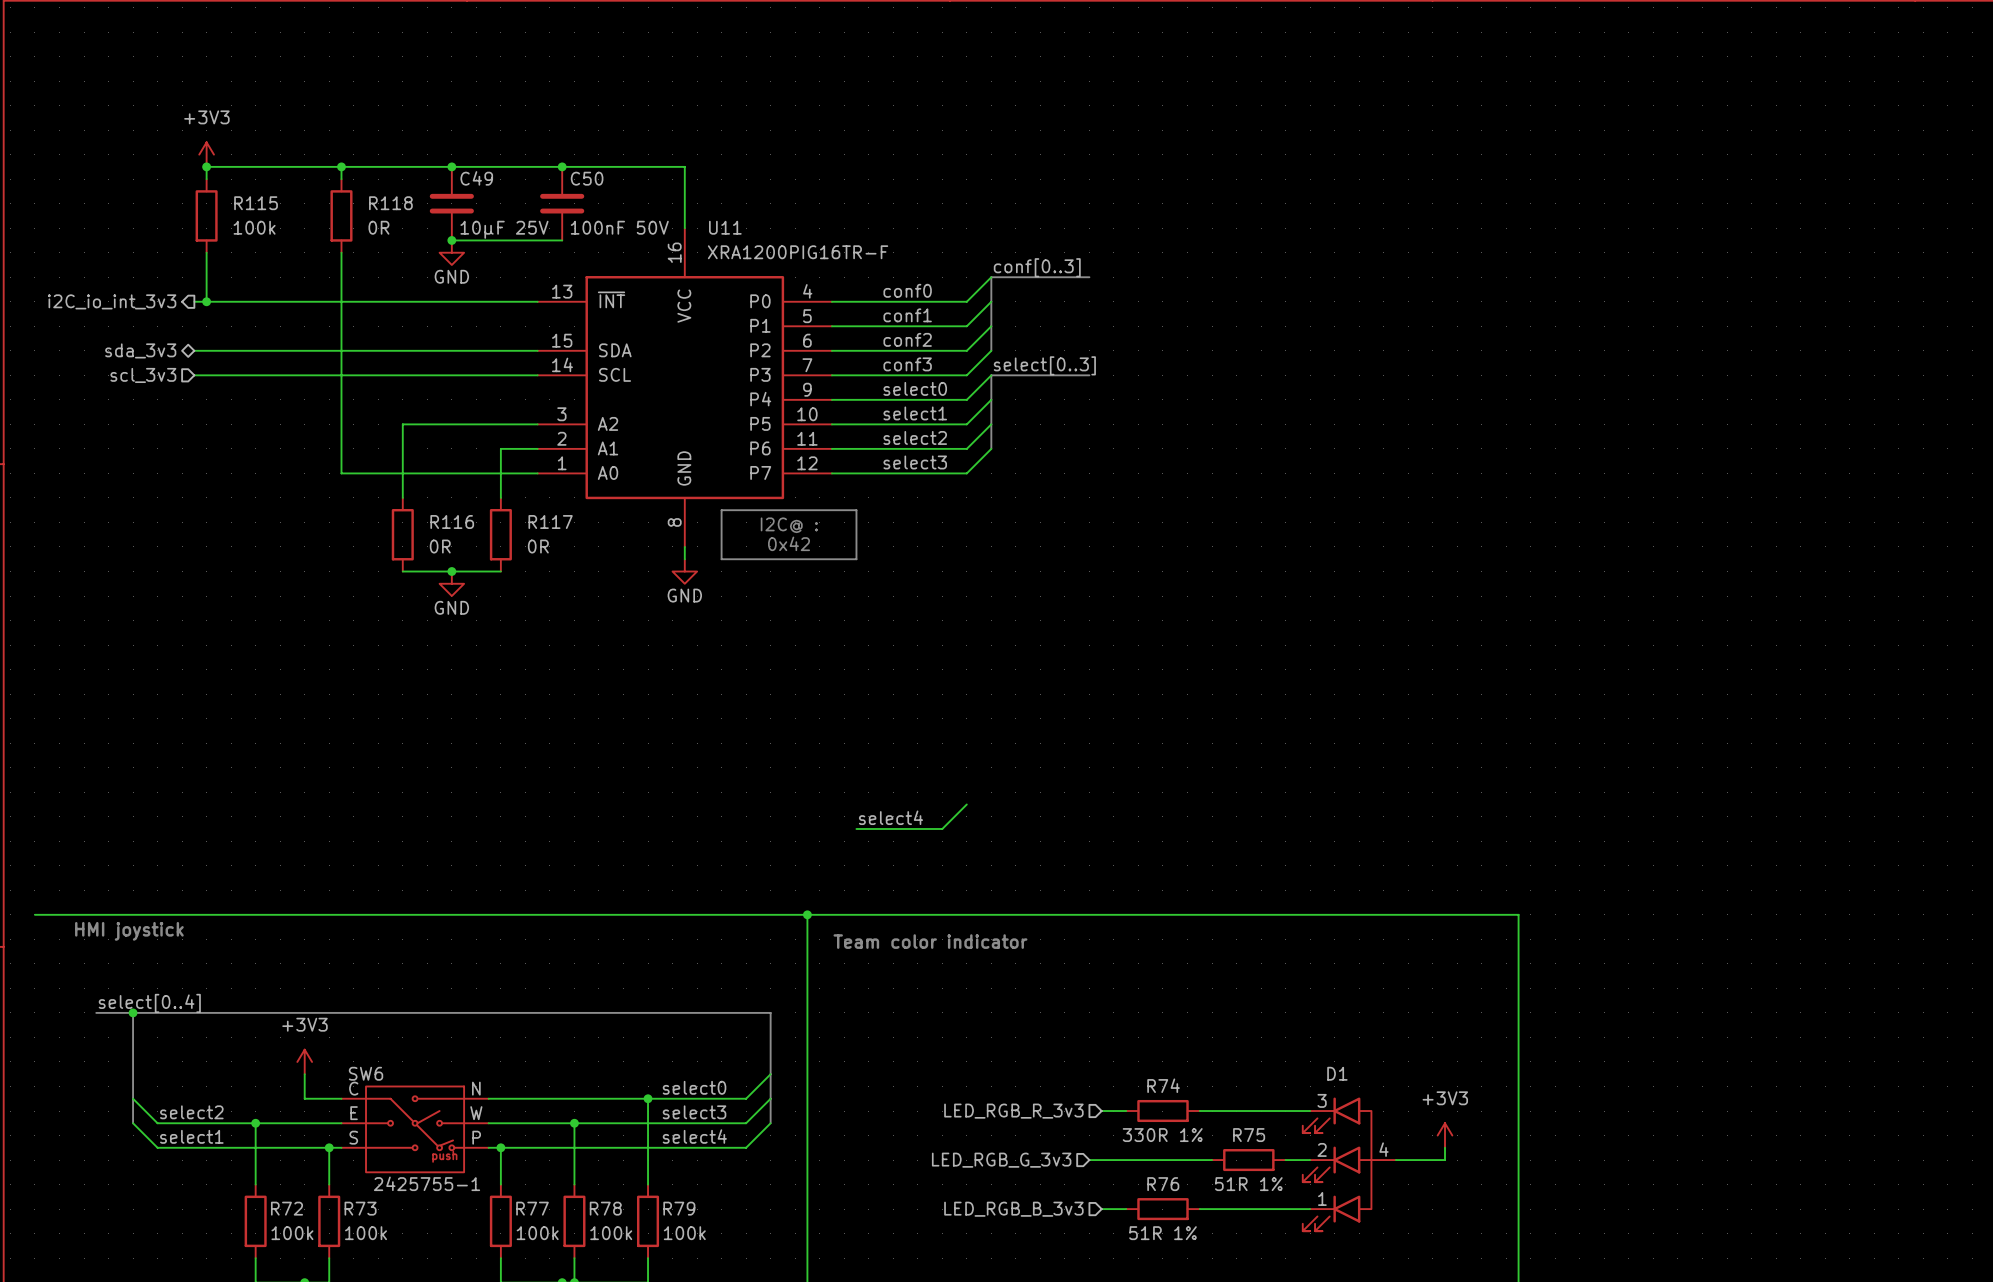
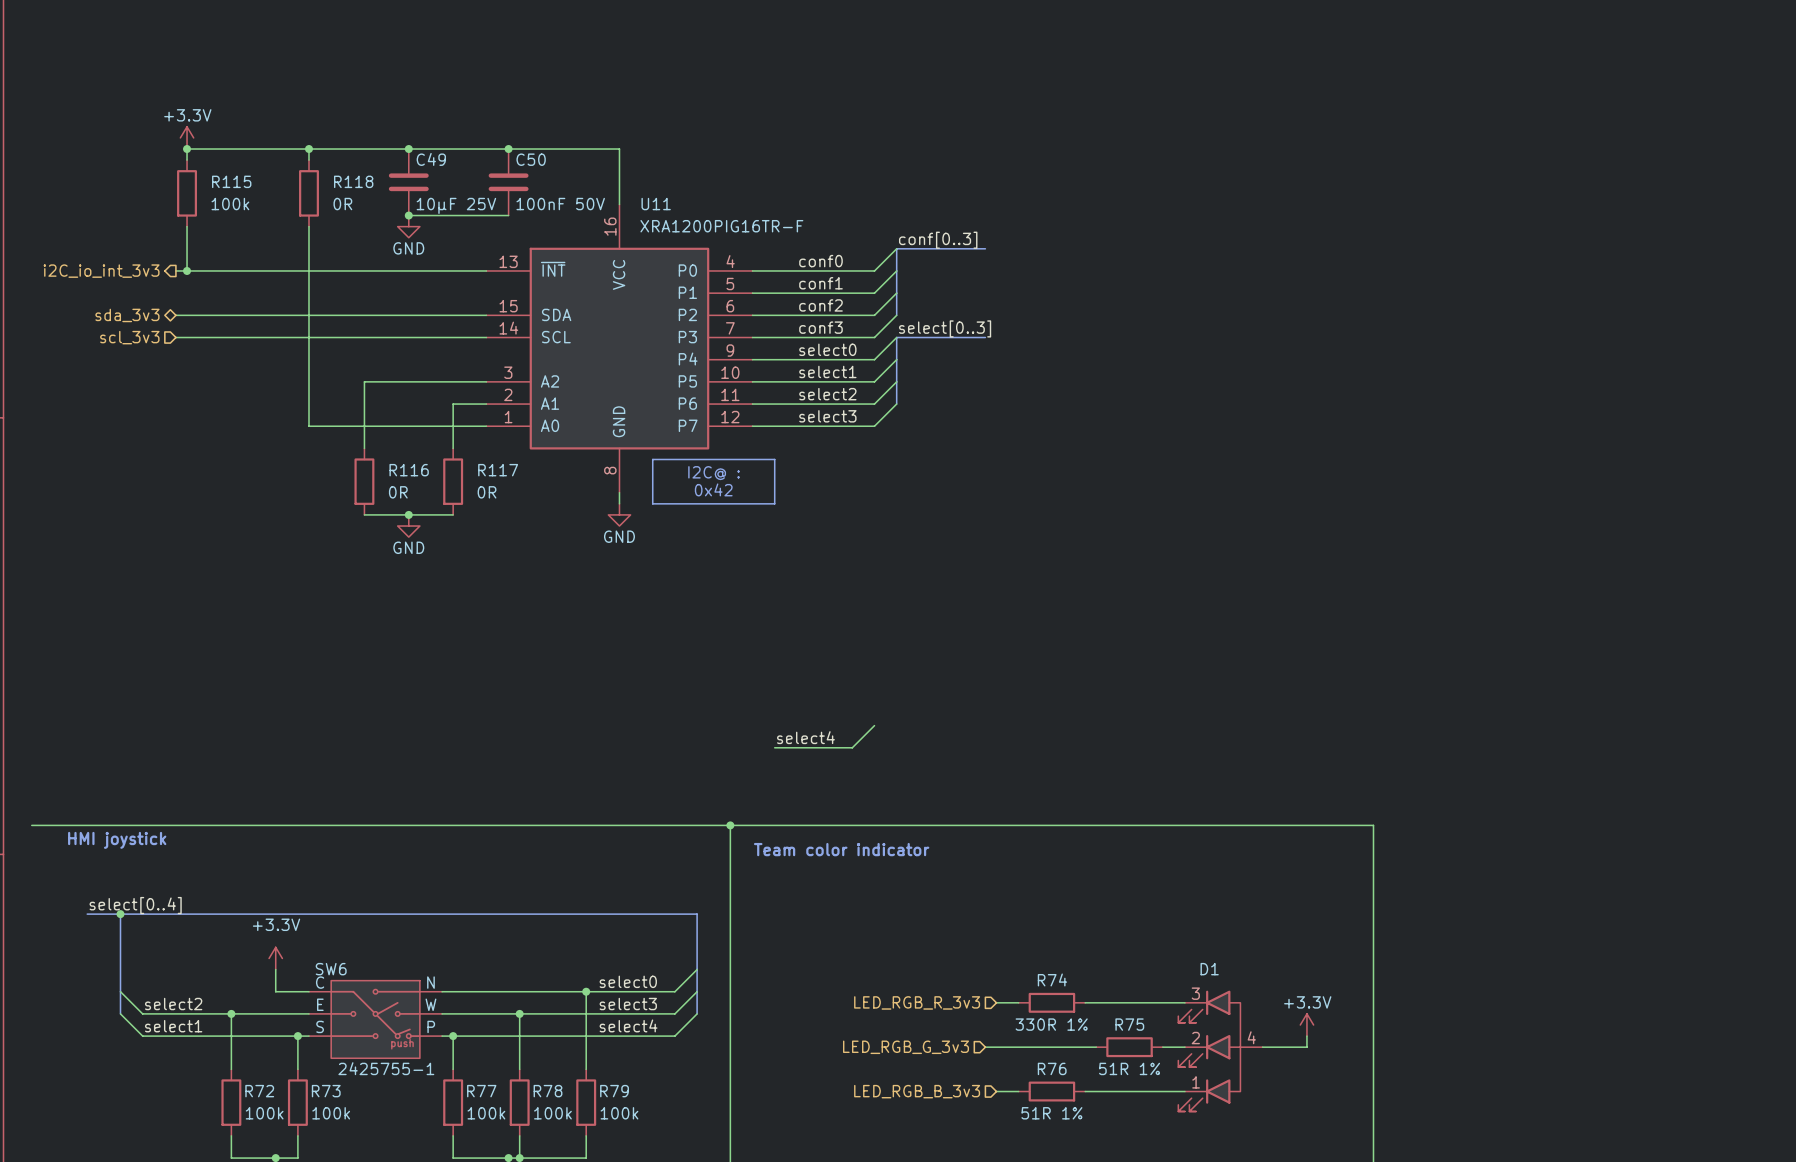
power symbol: +3V3 (206, 154) -> +3.3V (187, 137)
power symbol: +3V3 (304, 1061) -> +3.3V (275, 958)
power symbol: +3V3 (1445, 1135) -> +3.3V (1306, 1025)

